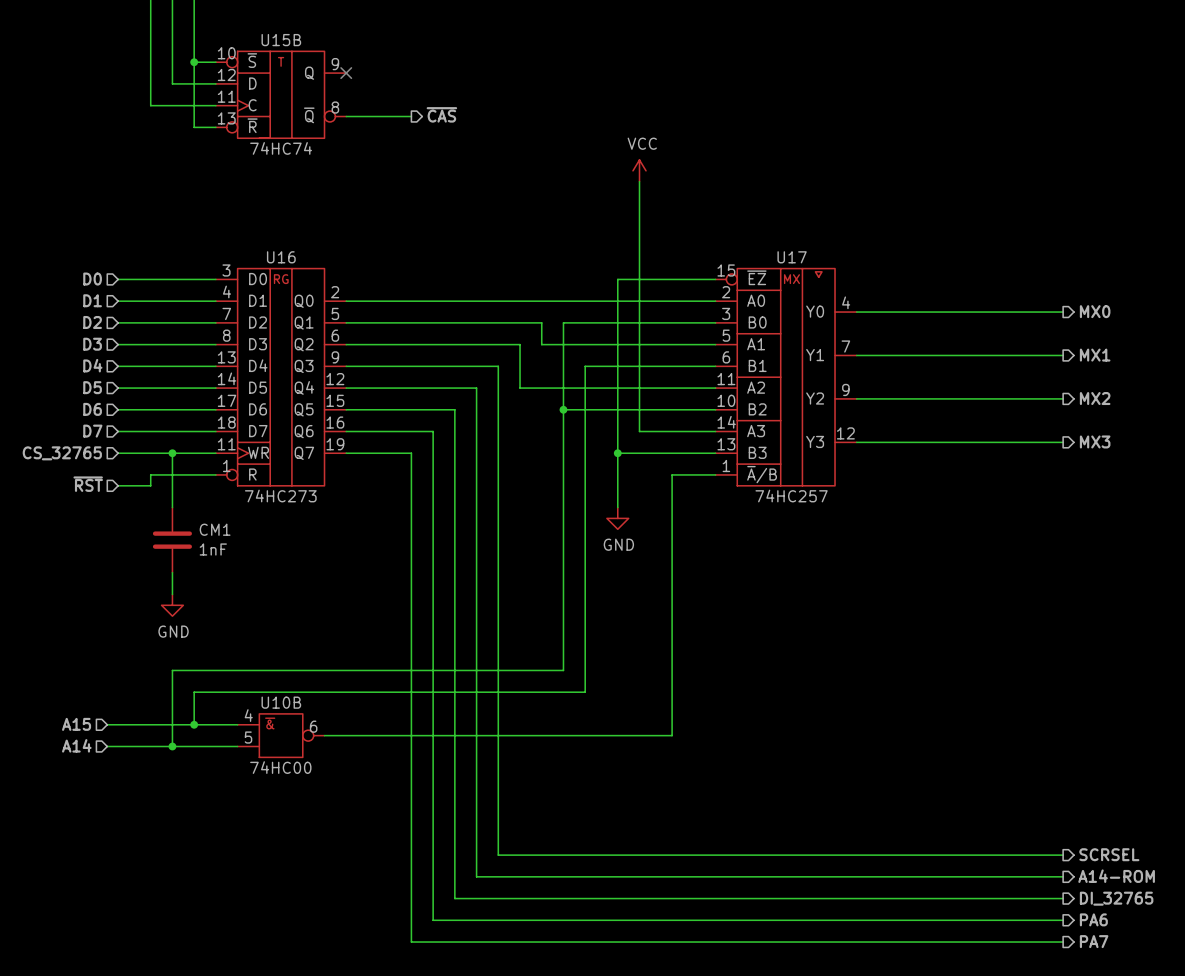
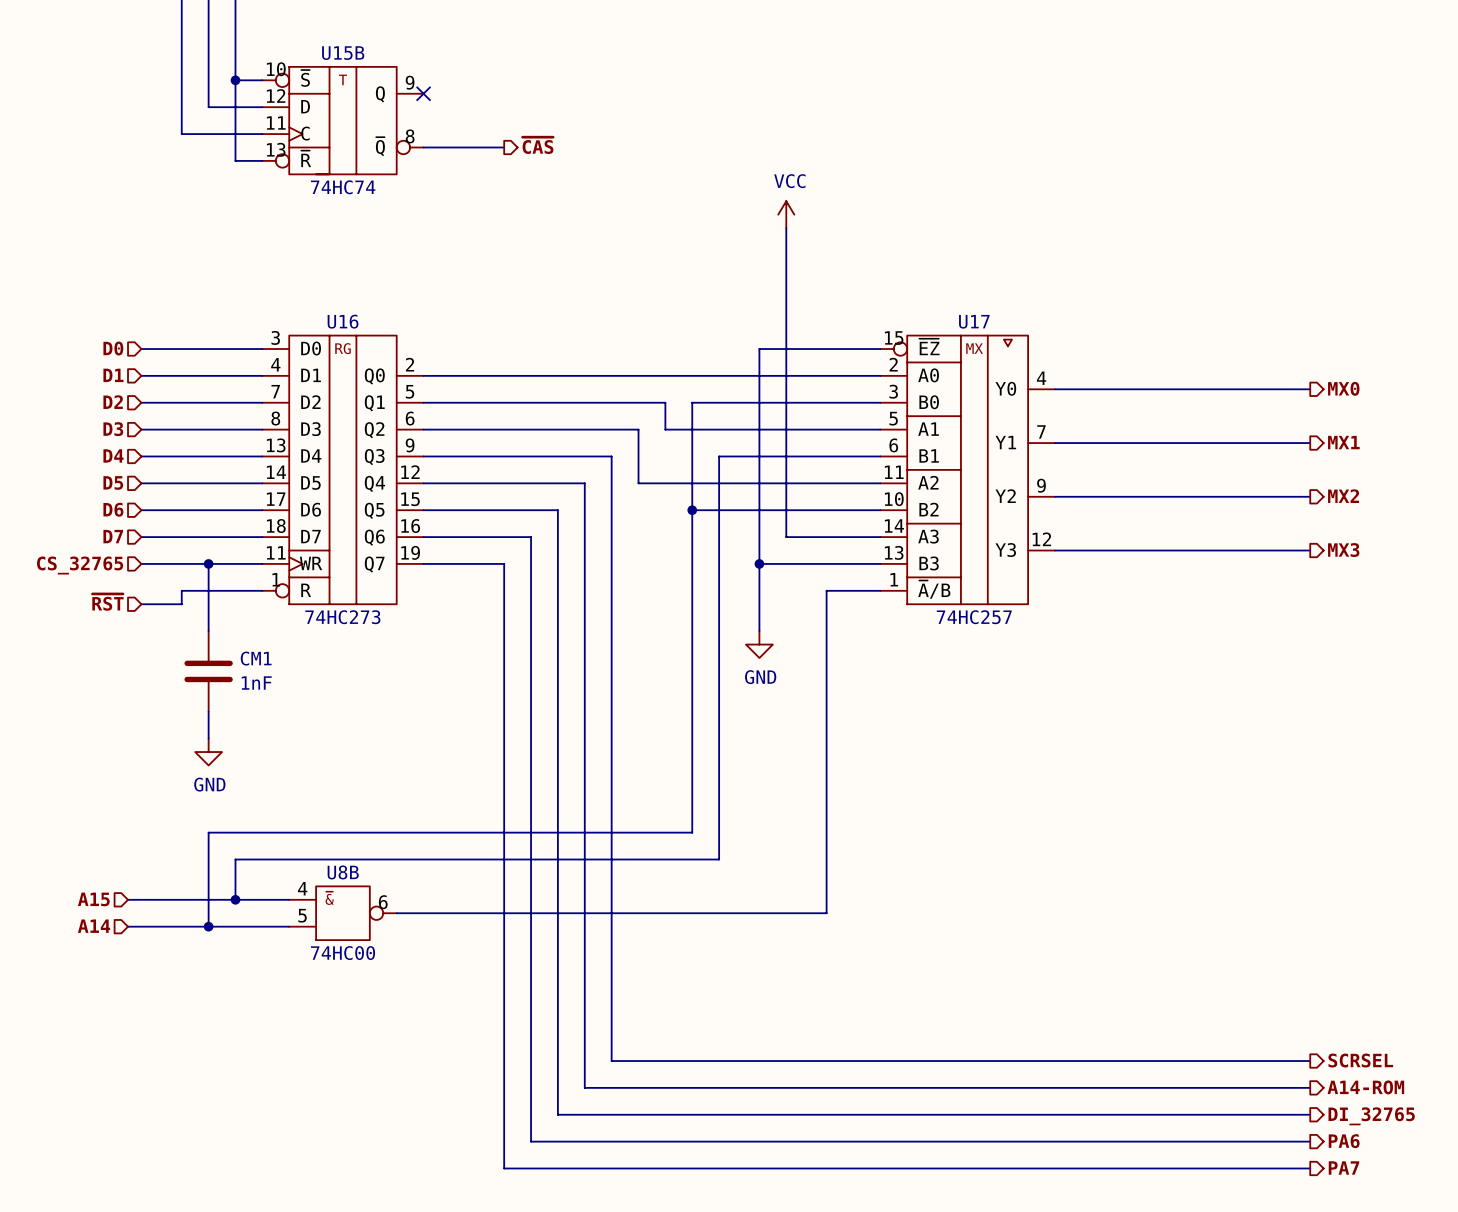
U10B name: U10B (281, 702) -> U8B (343, 872)

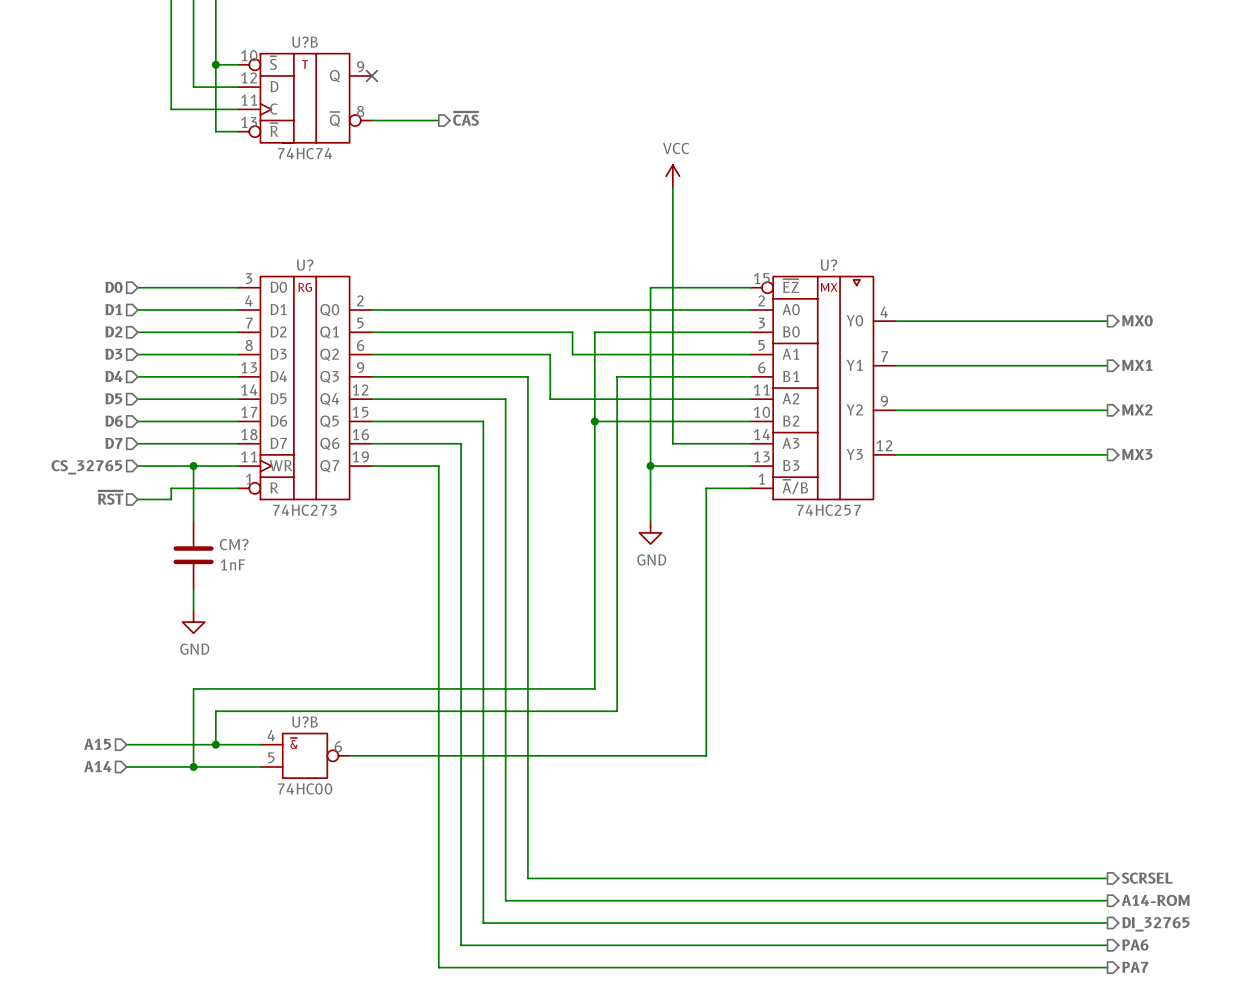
U15B name: U15B (343, 53) -> U?B (304, 42)
U16 name: U16 (343, 321) -> U? (305, 265)
U17 name: U17 (974, 321) -> U? (829, 265)
CM1 name: CM1 (256, 658) -> CM? (234, 544)
U8B name: U8B (343, 872) -> U?B (304, 722)

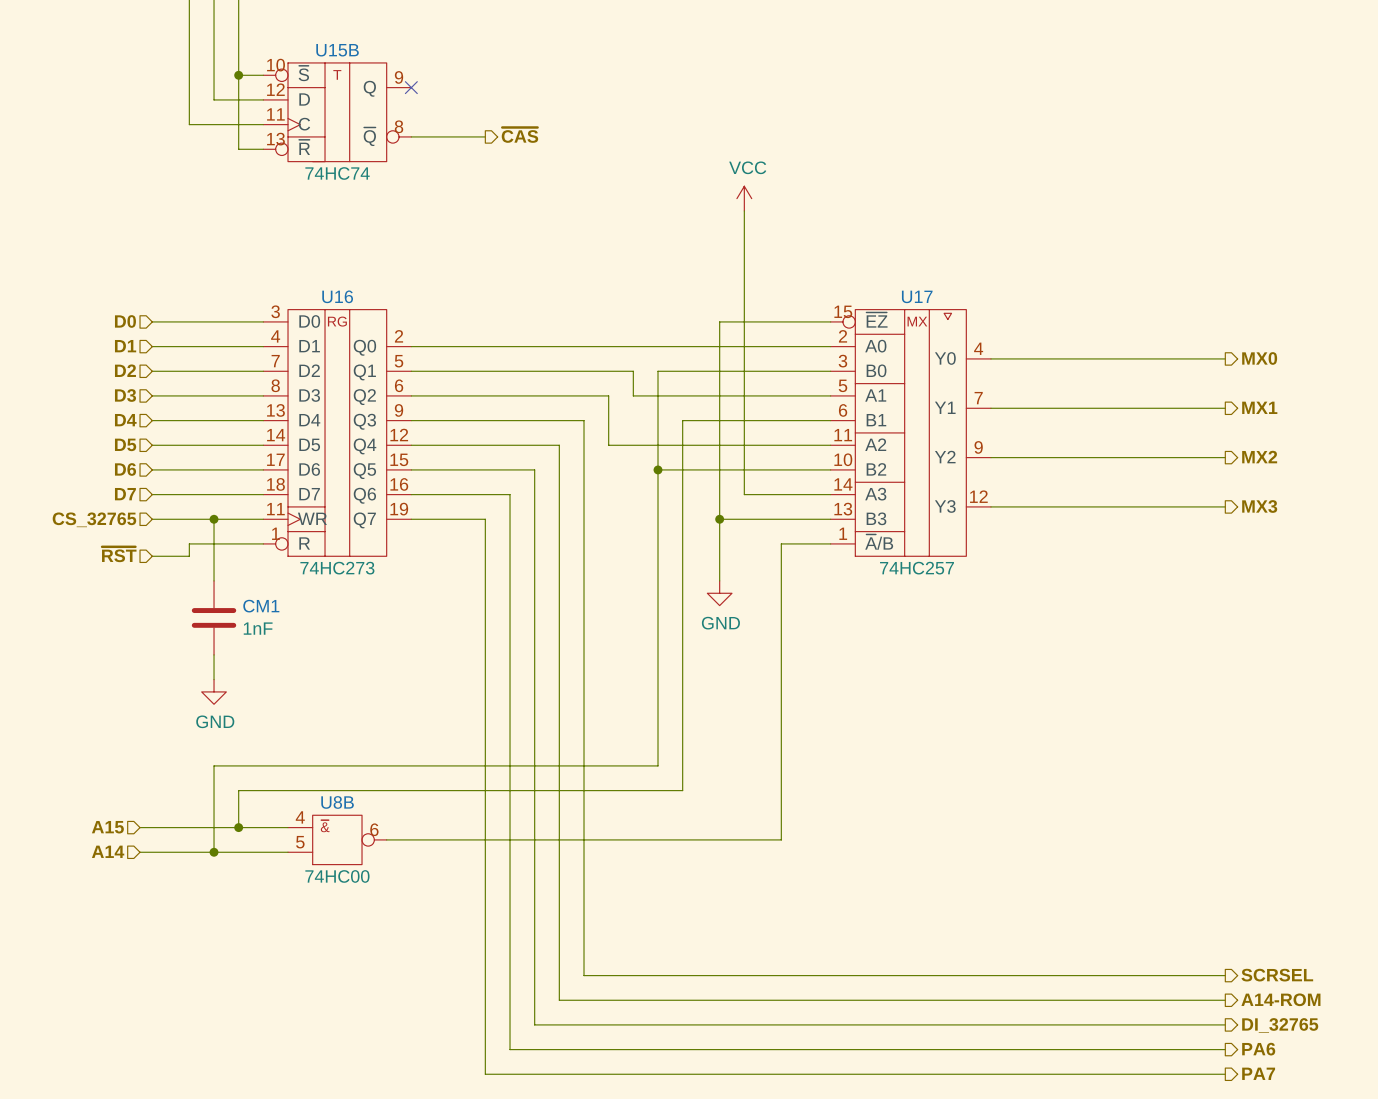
U?B name: U?B (304, 42) -> U15B (337, 50)
U? name: U? (305, 265) -> U16 (337, 296)
U? name: U? (829, 265) -> U17 (917, 296)
CM? name: CM? (234, 544) -> CM1 (261, 606)
U?B name: U?B (304, 722) -> U8B (337, 802)

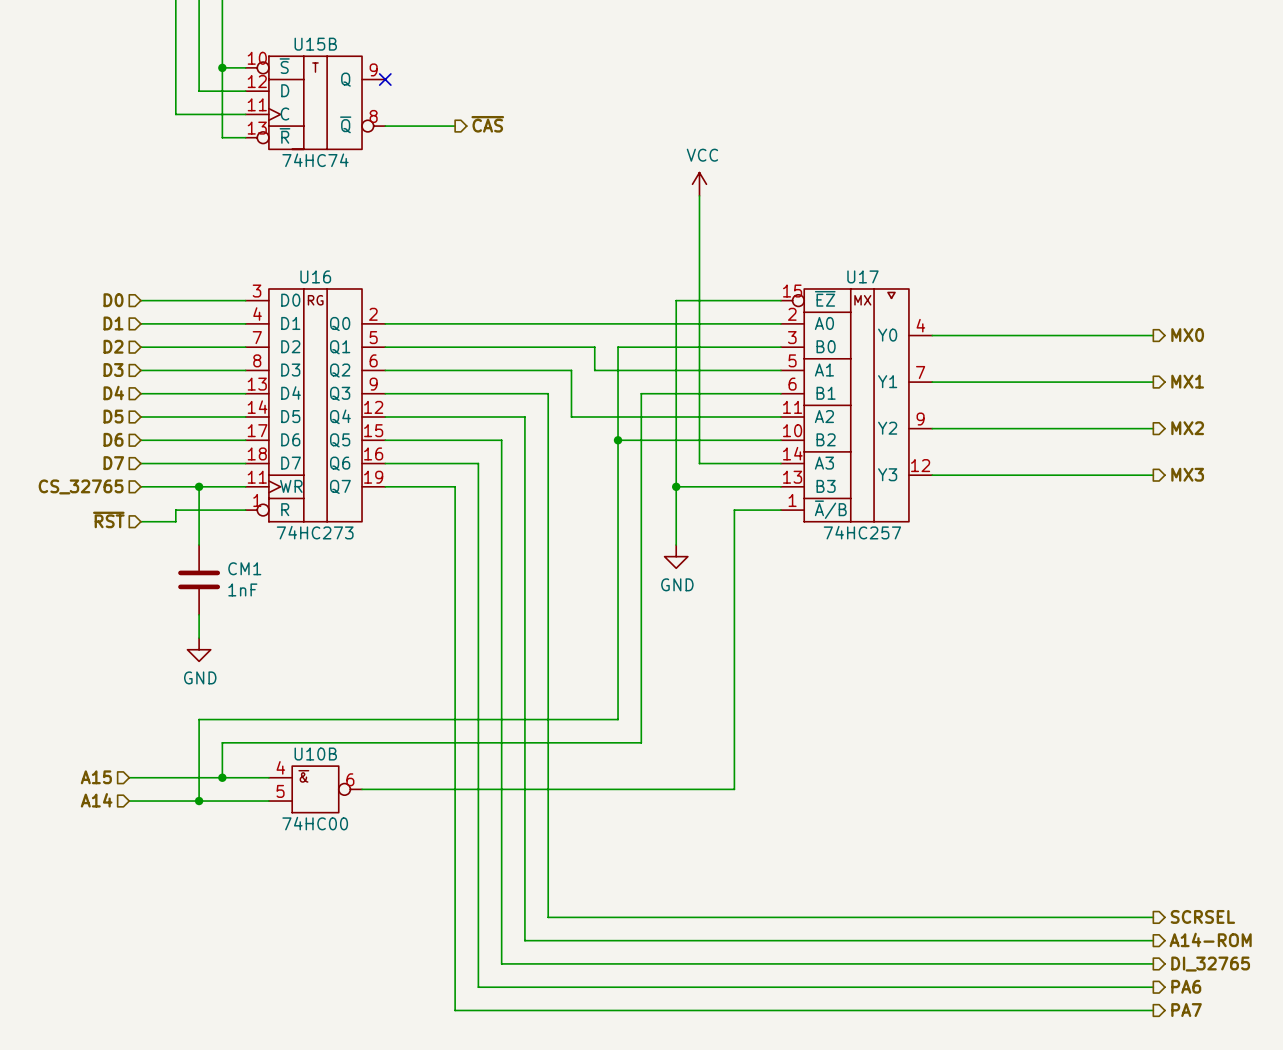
U8B name: U8B (337, 802) -> U10B (315, 754)

